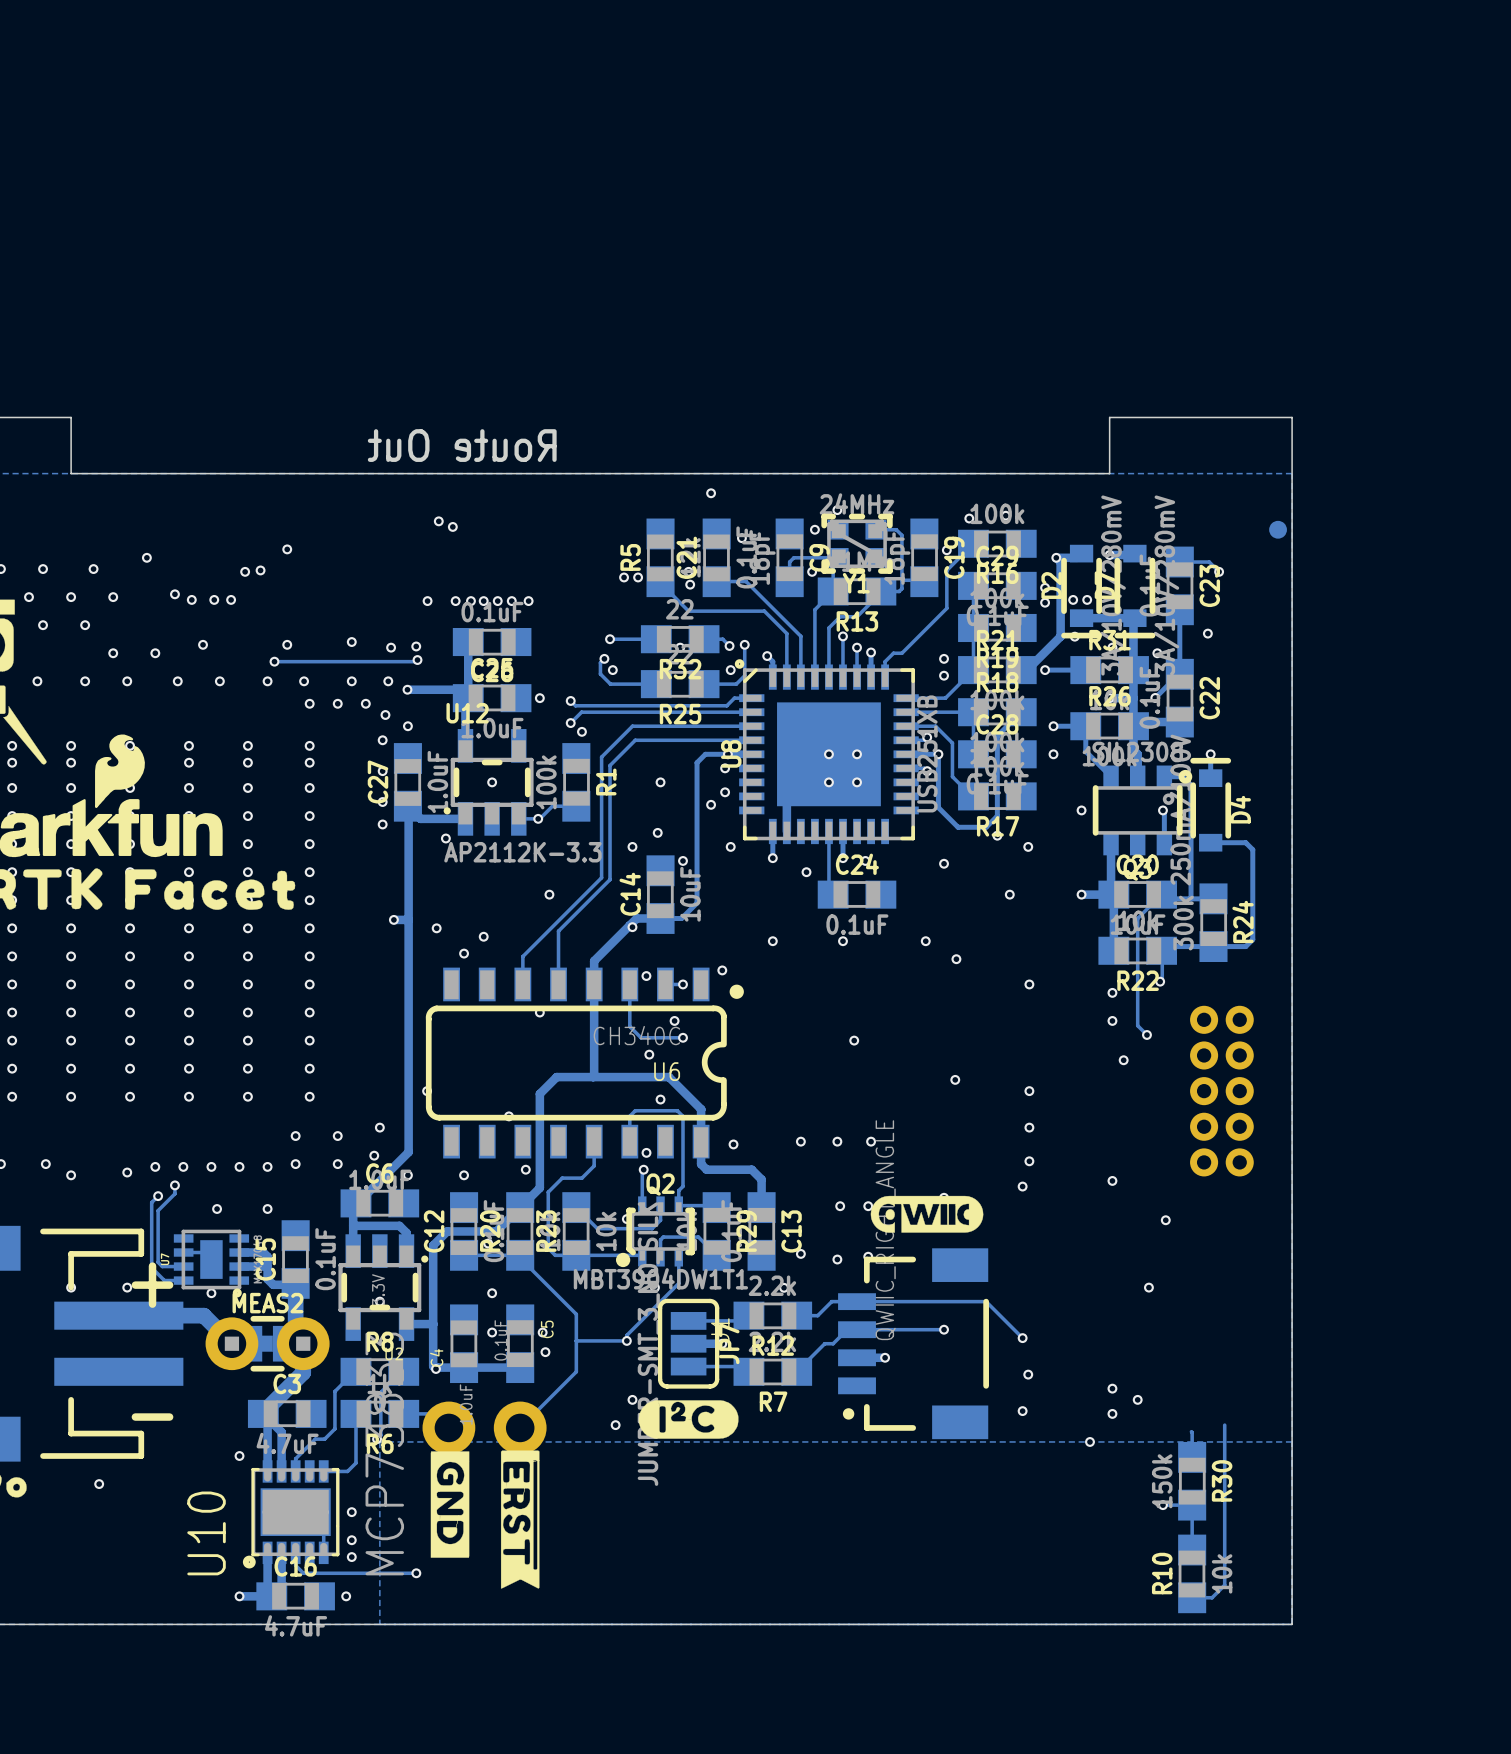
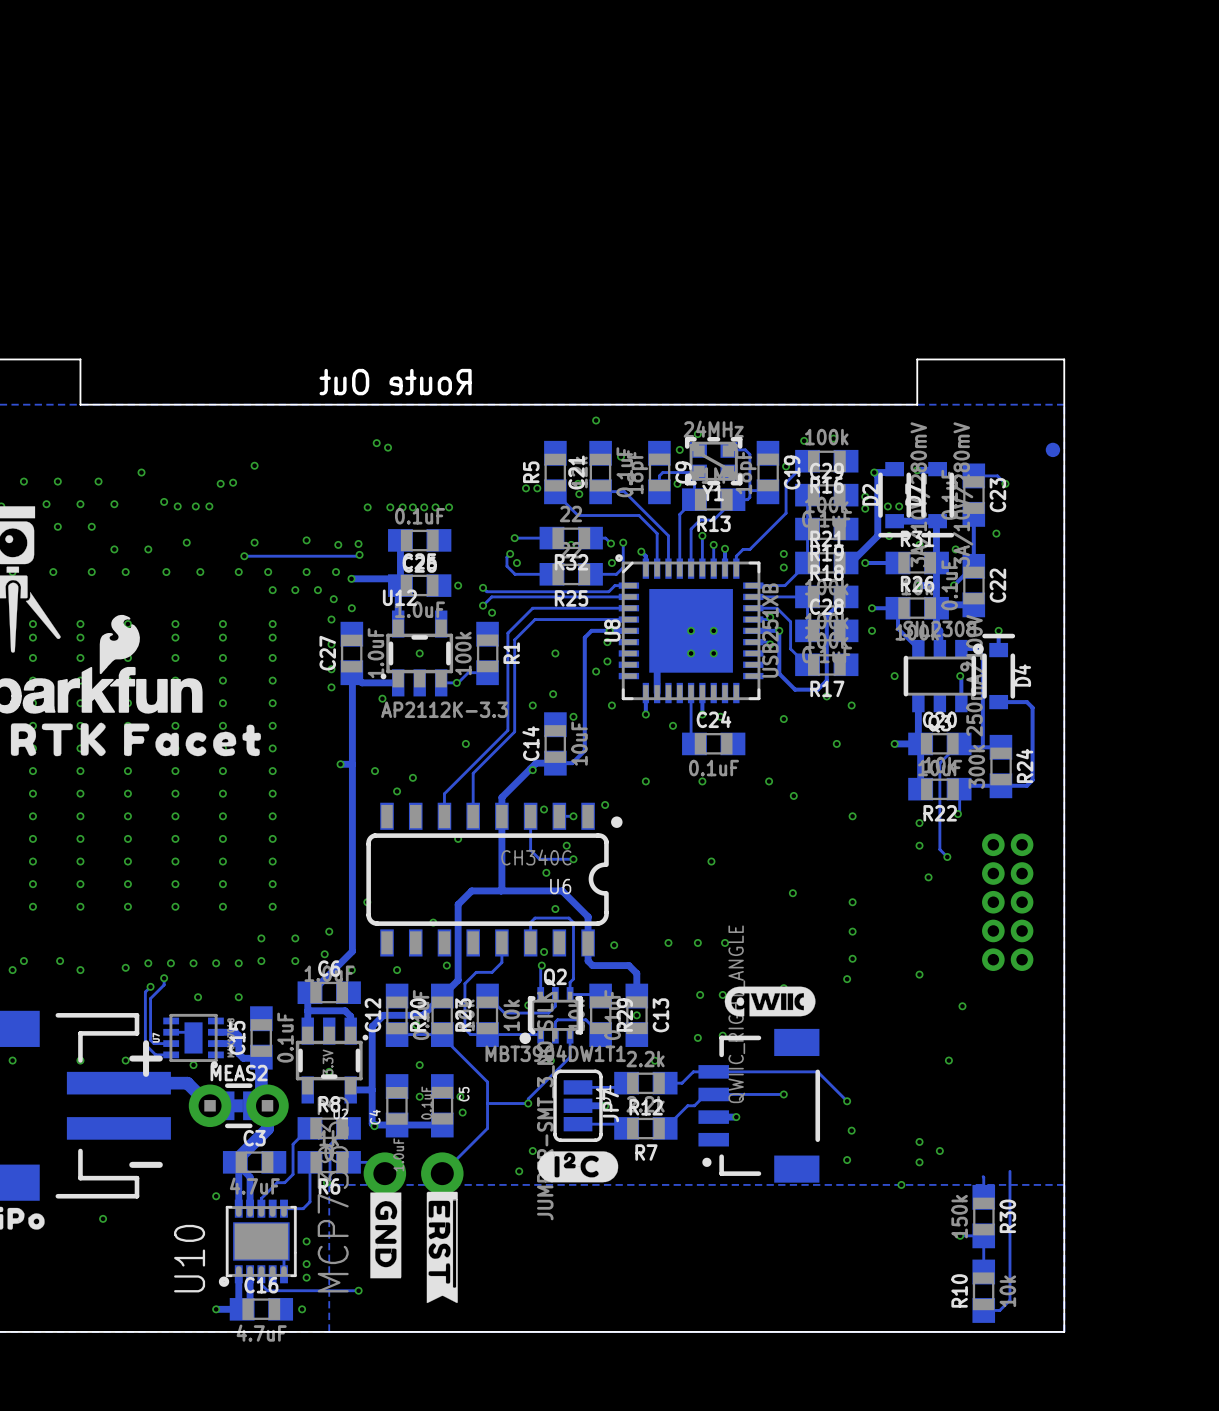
via position: (800, 1253) -> (636, 1015)

